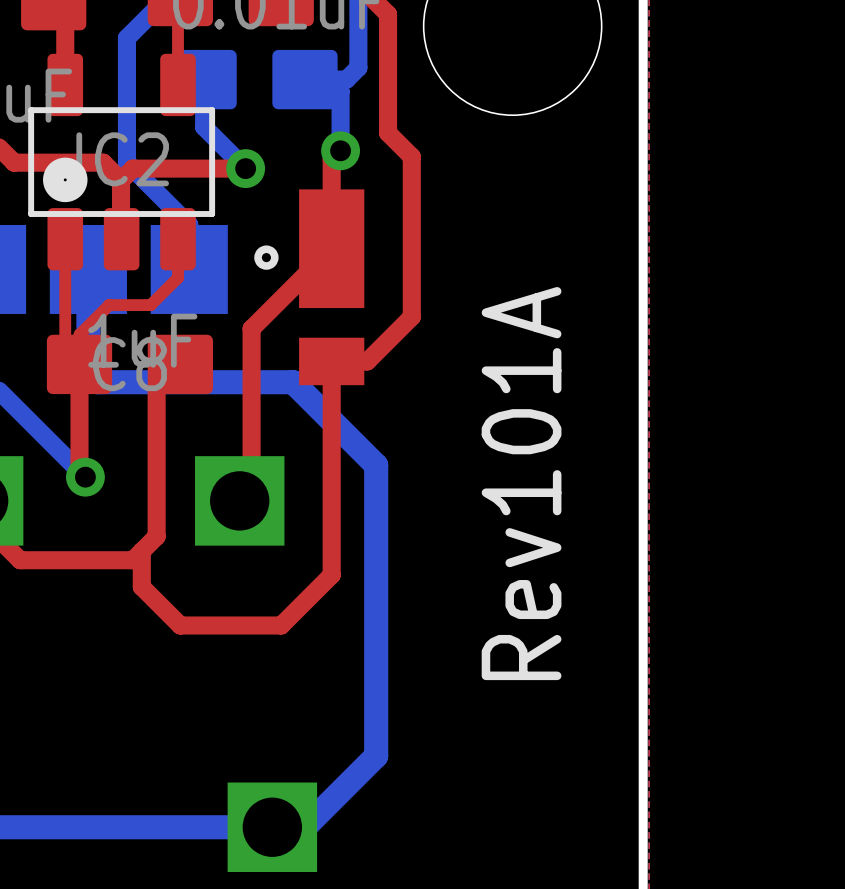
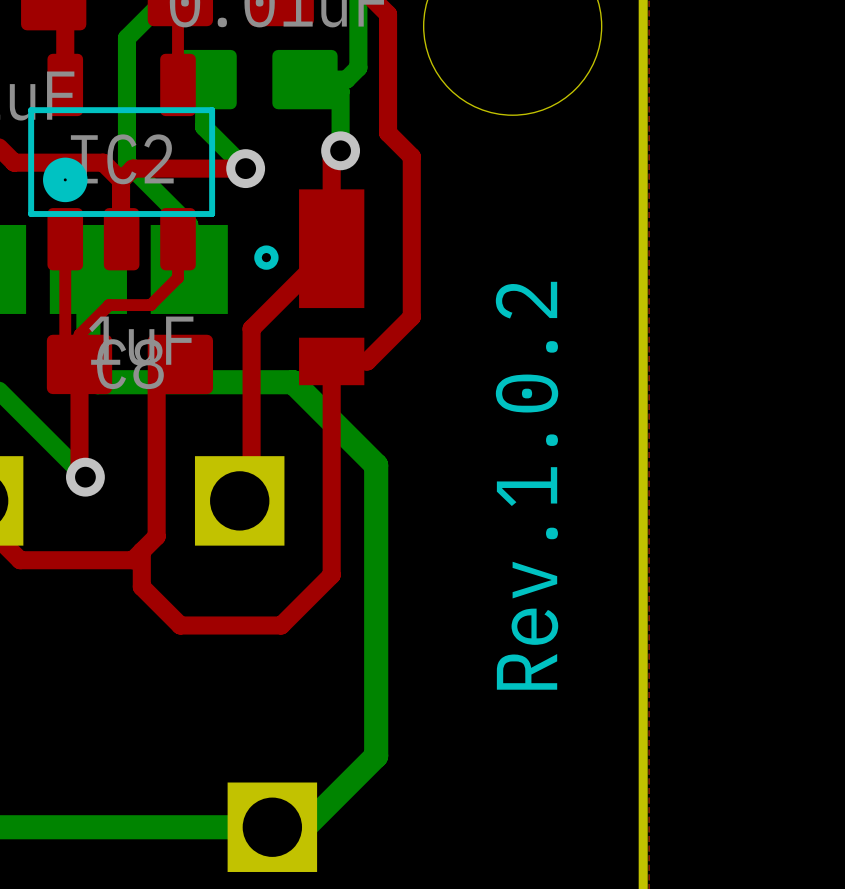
text: Rev101A (521, 483) -> Rev.1.0.2 (527, 485)

